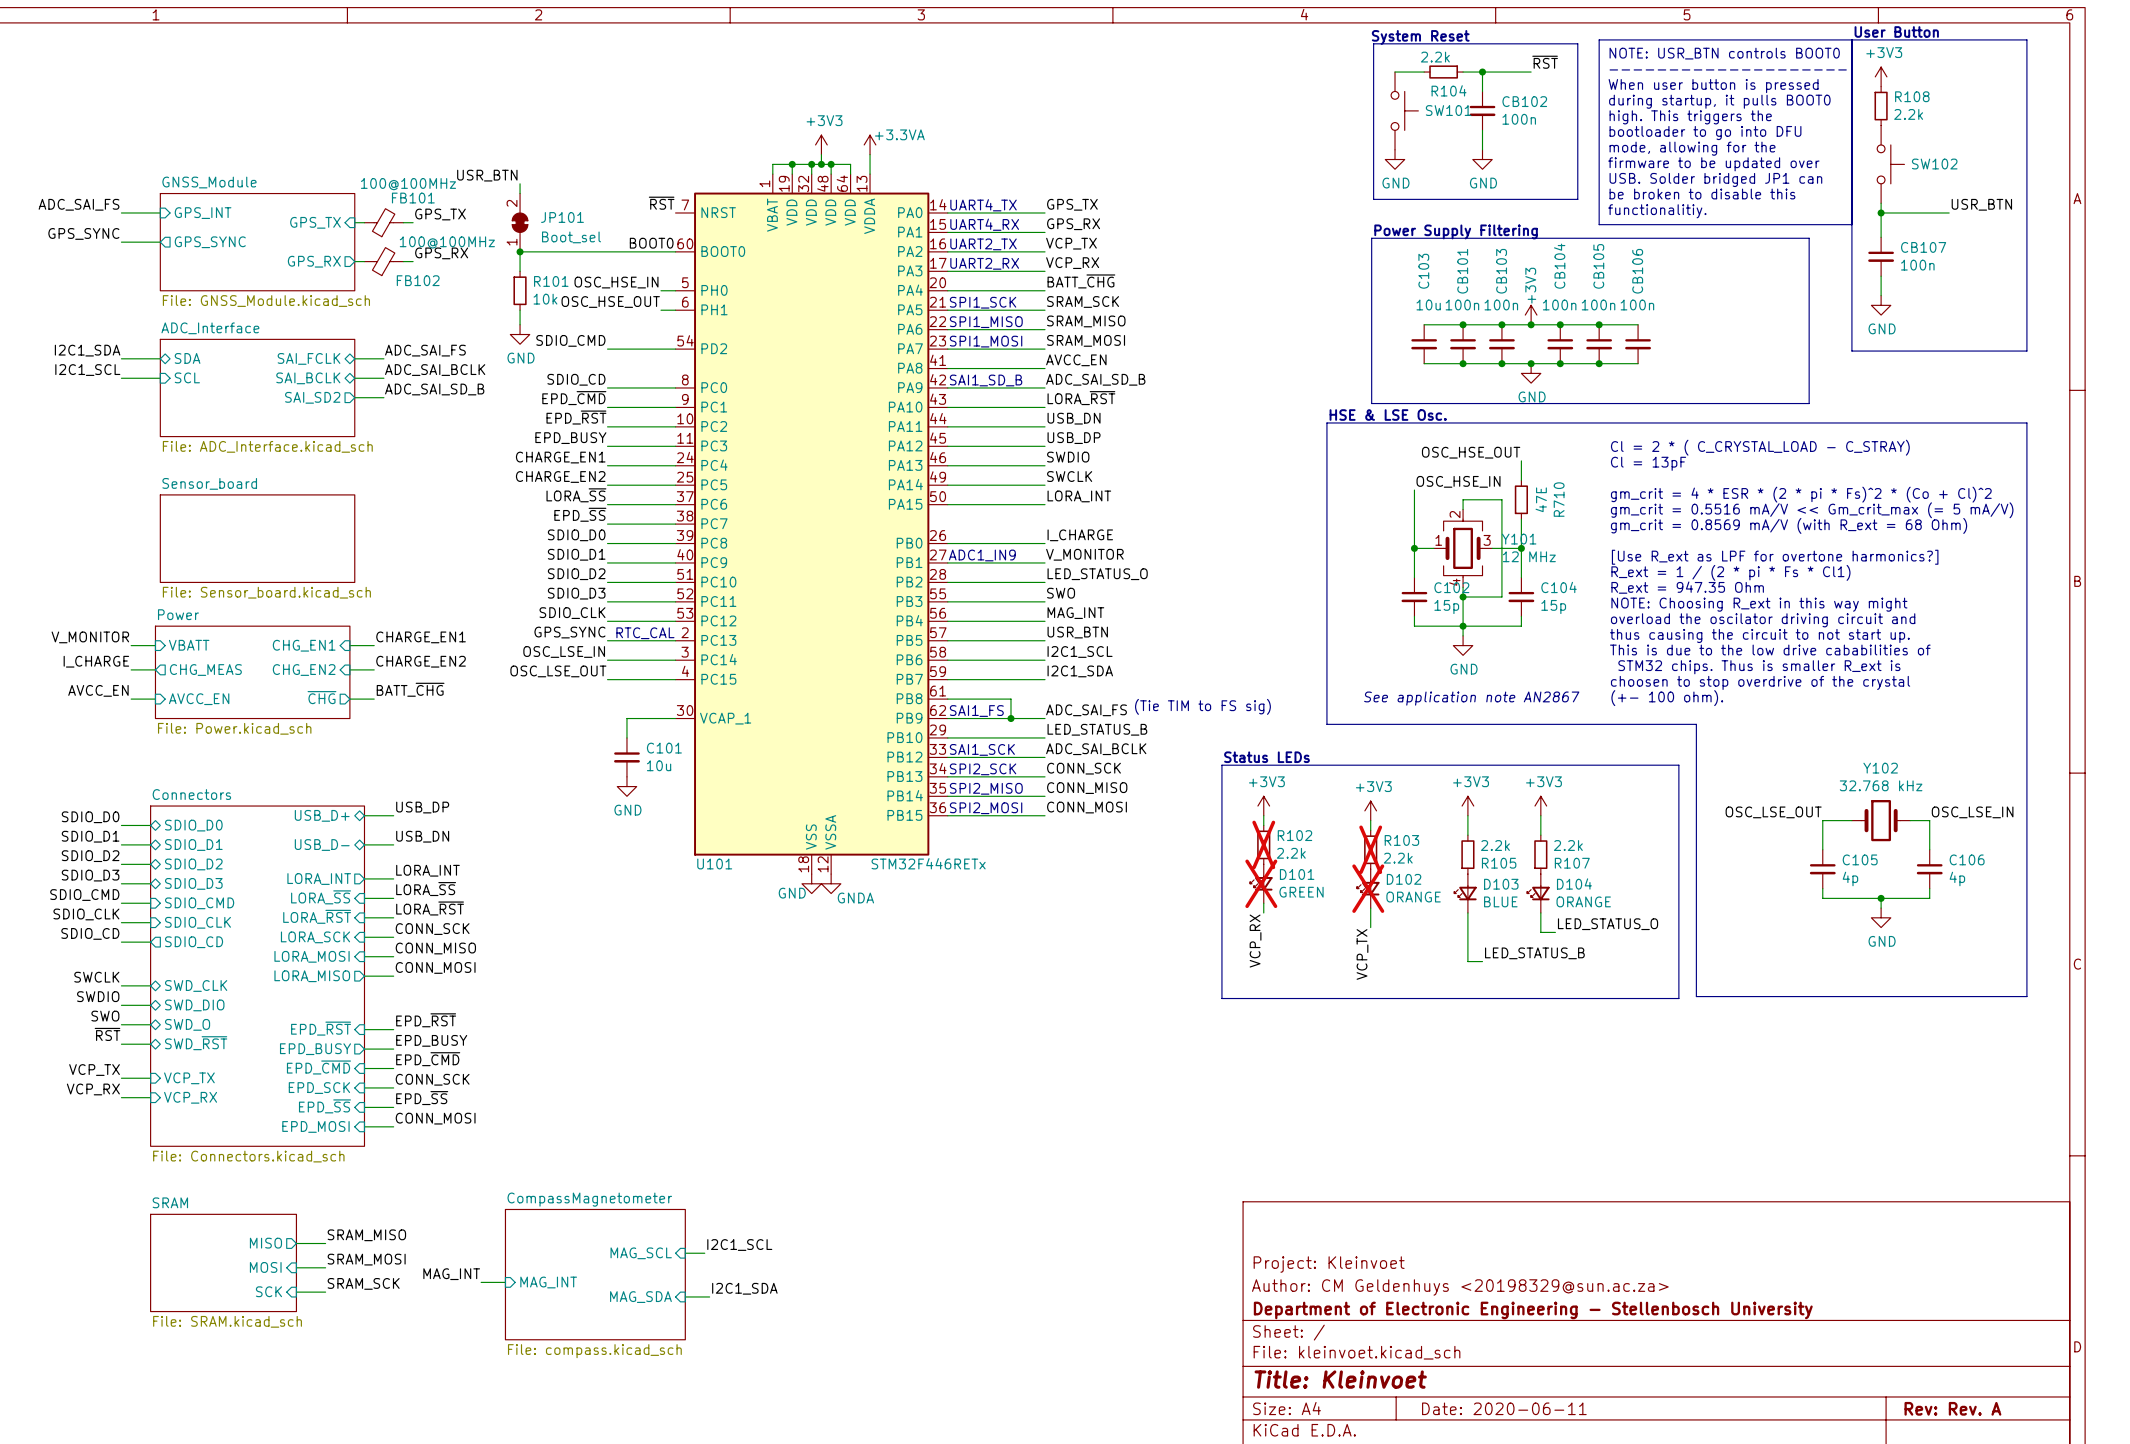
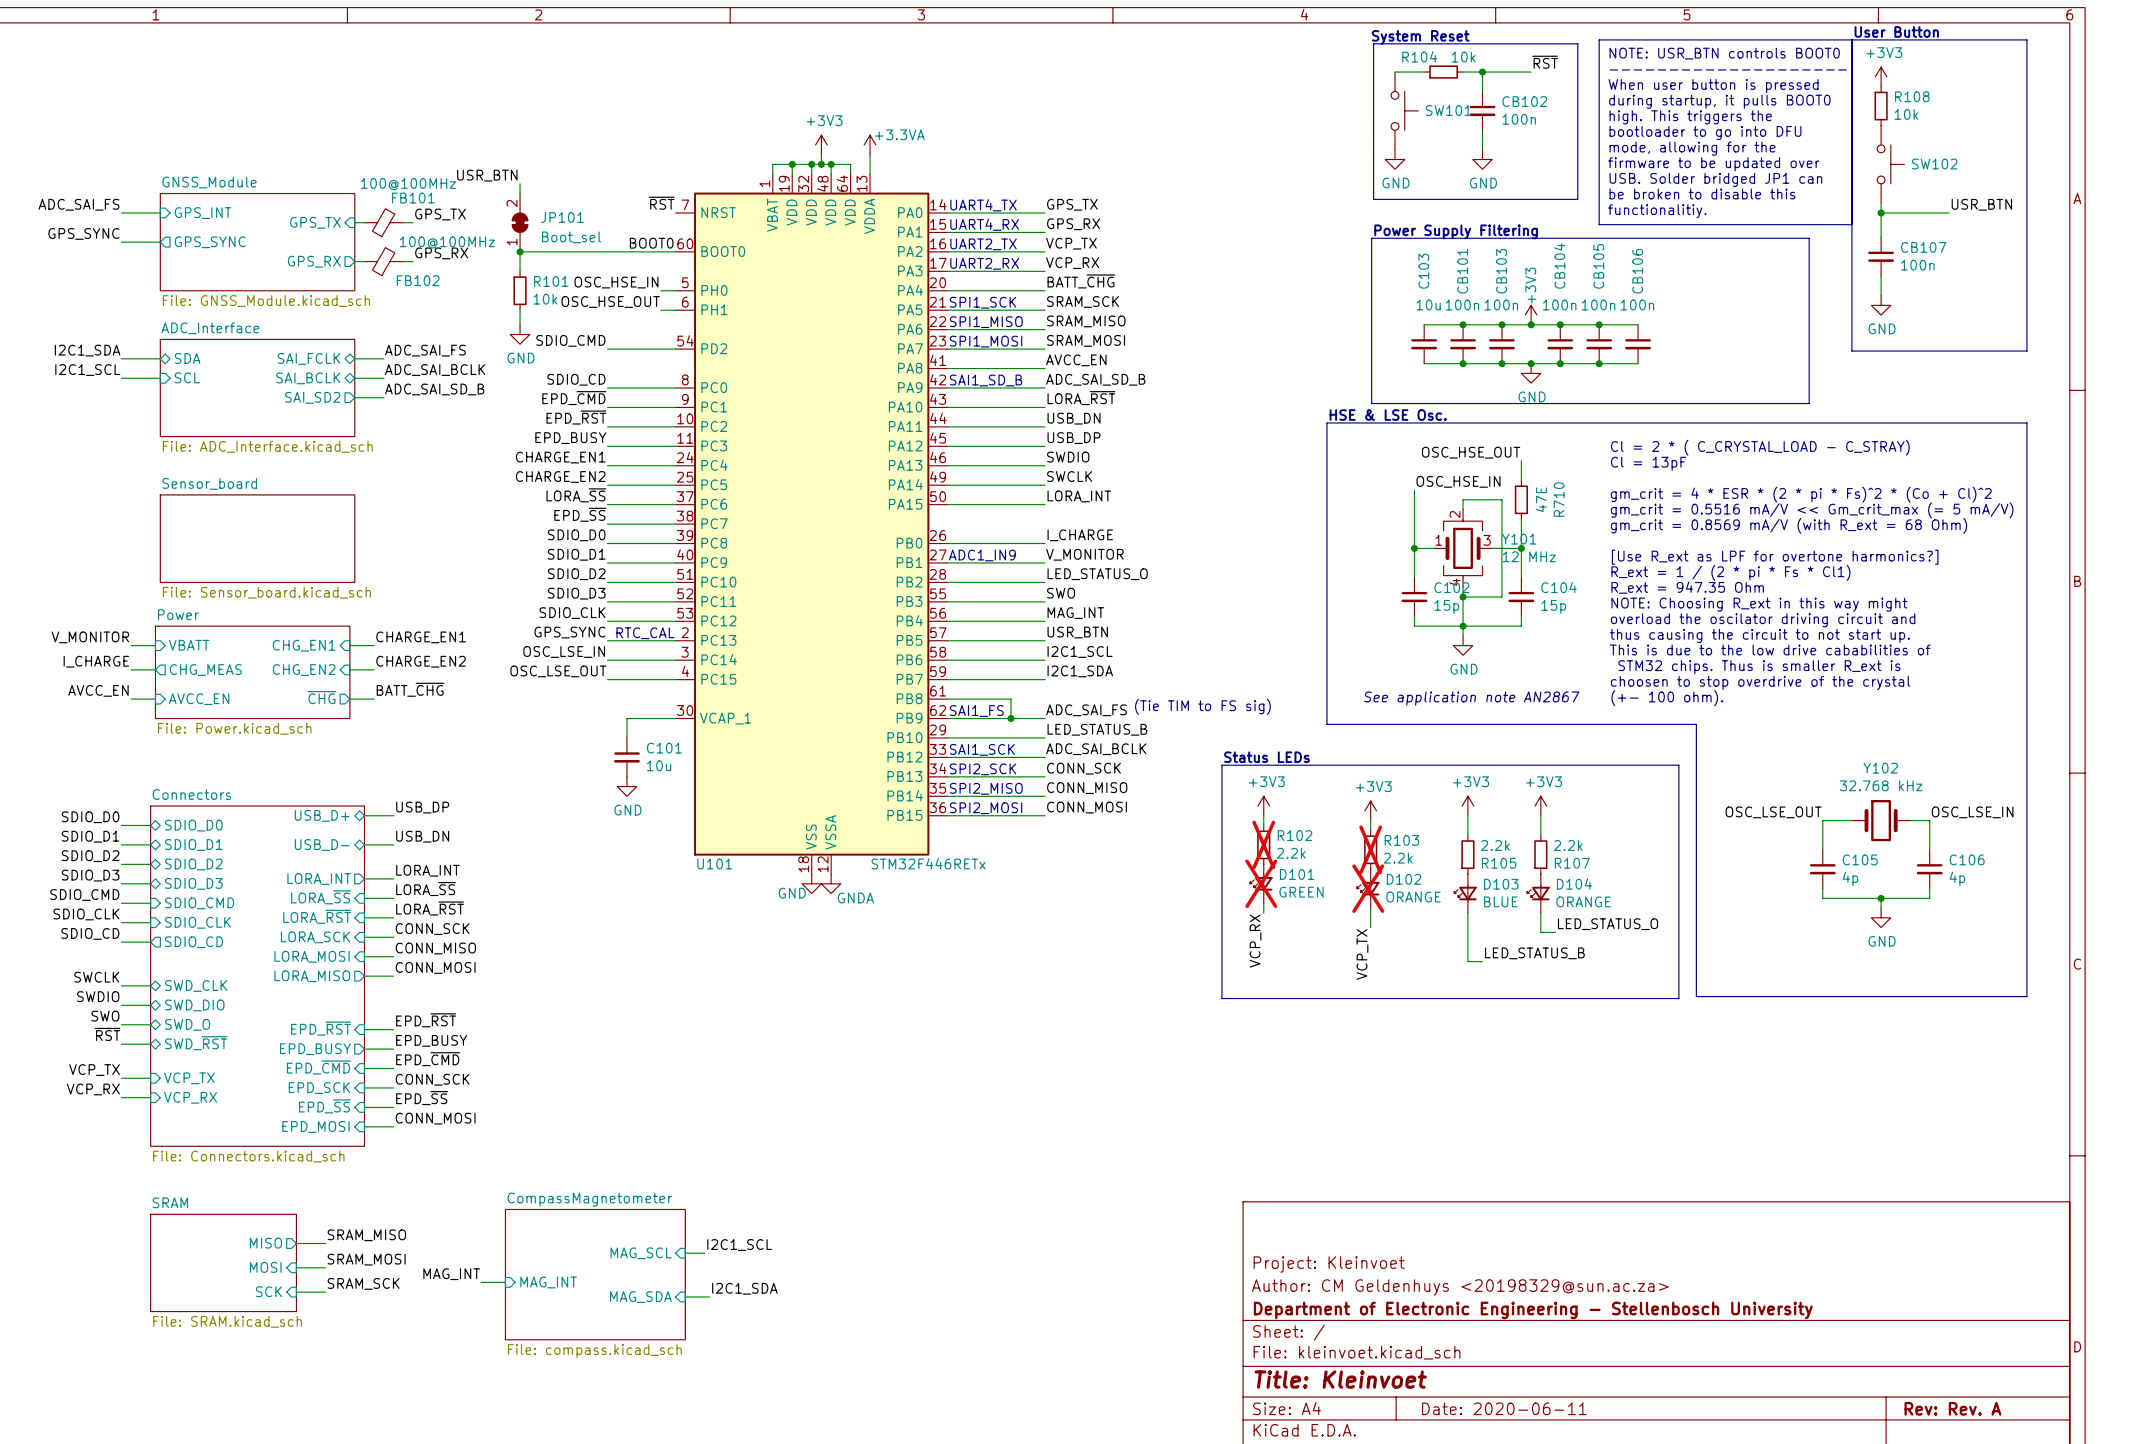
R104 value: 2.2k (1435, 57) -> 10k (1463, 57)
R104 name position: R104 (1449, 90) -> R104 (1419, 56)
R108 value: 2.2k (1908, 114) -> 10k (1906, 114)

